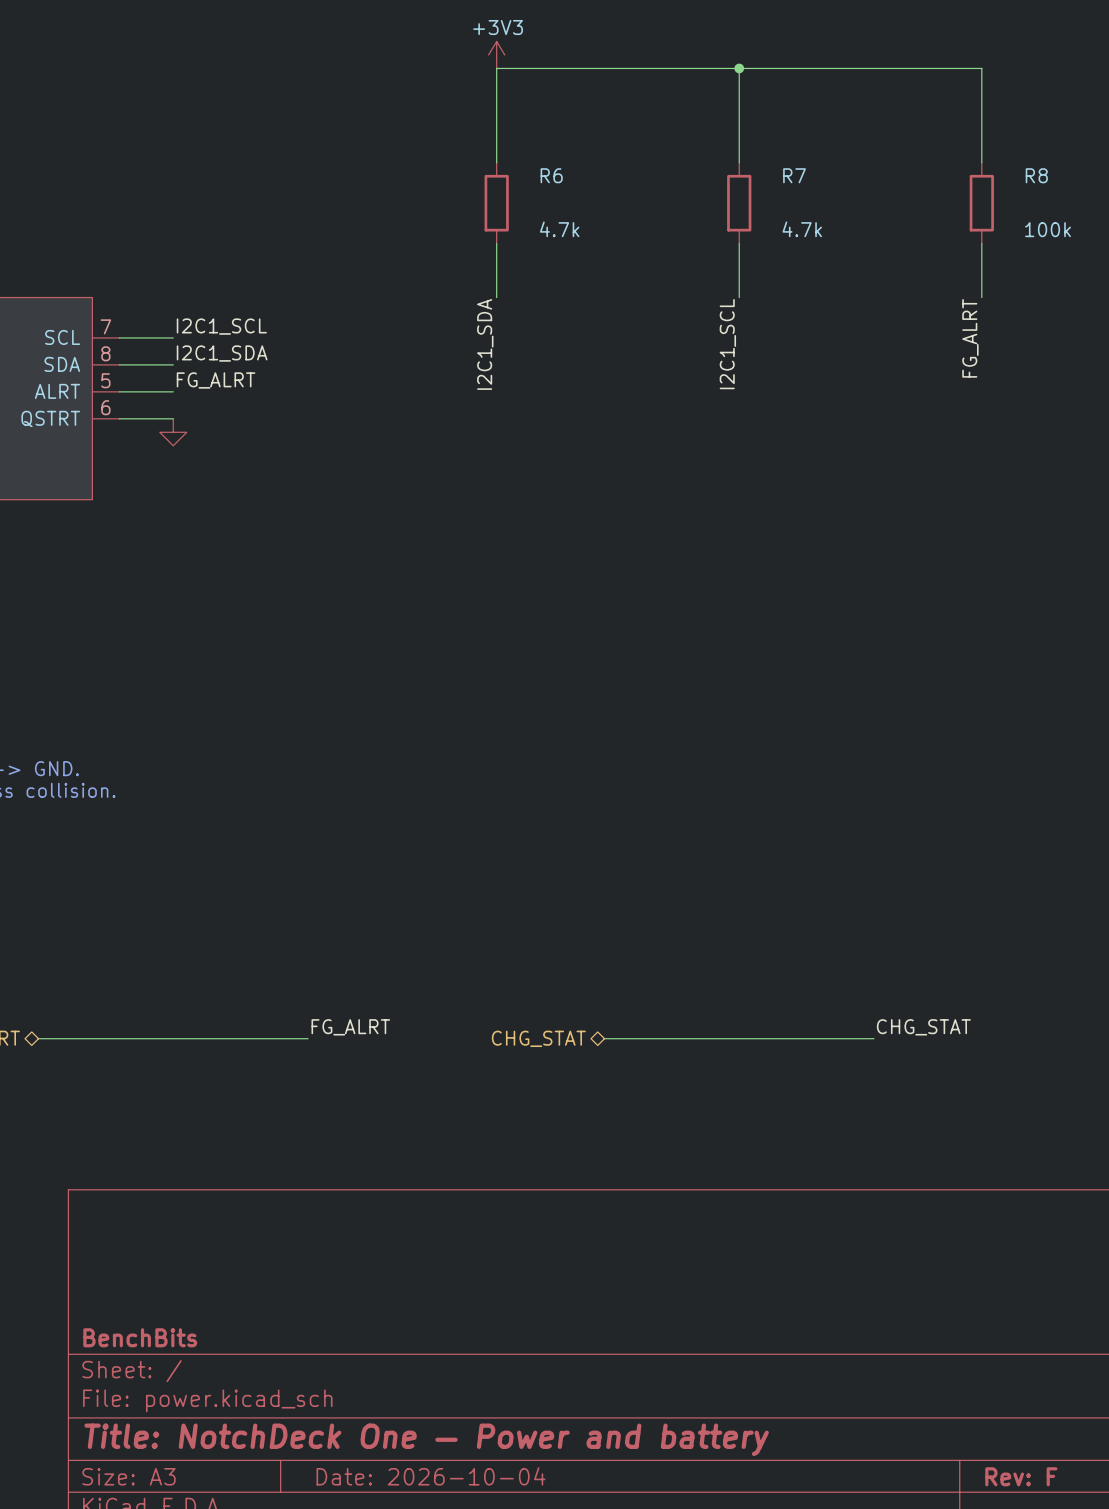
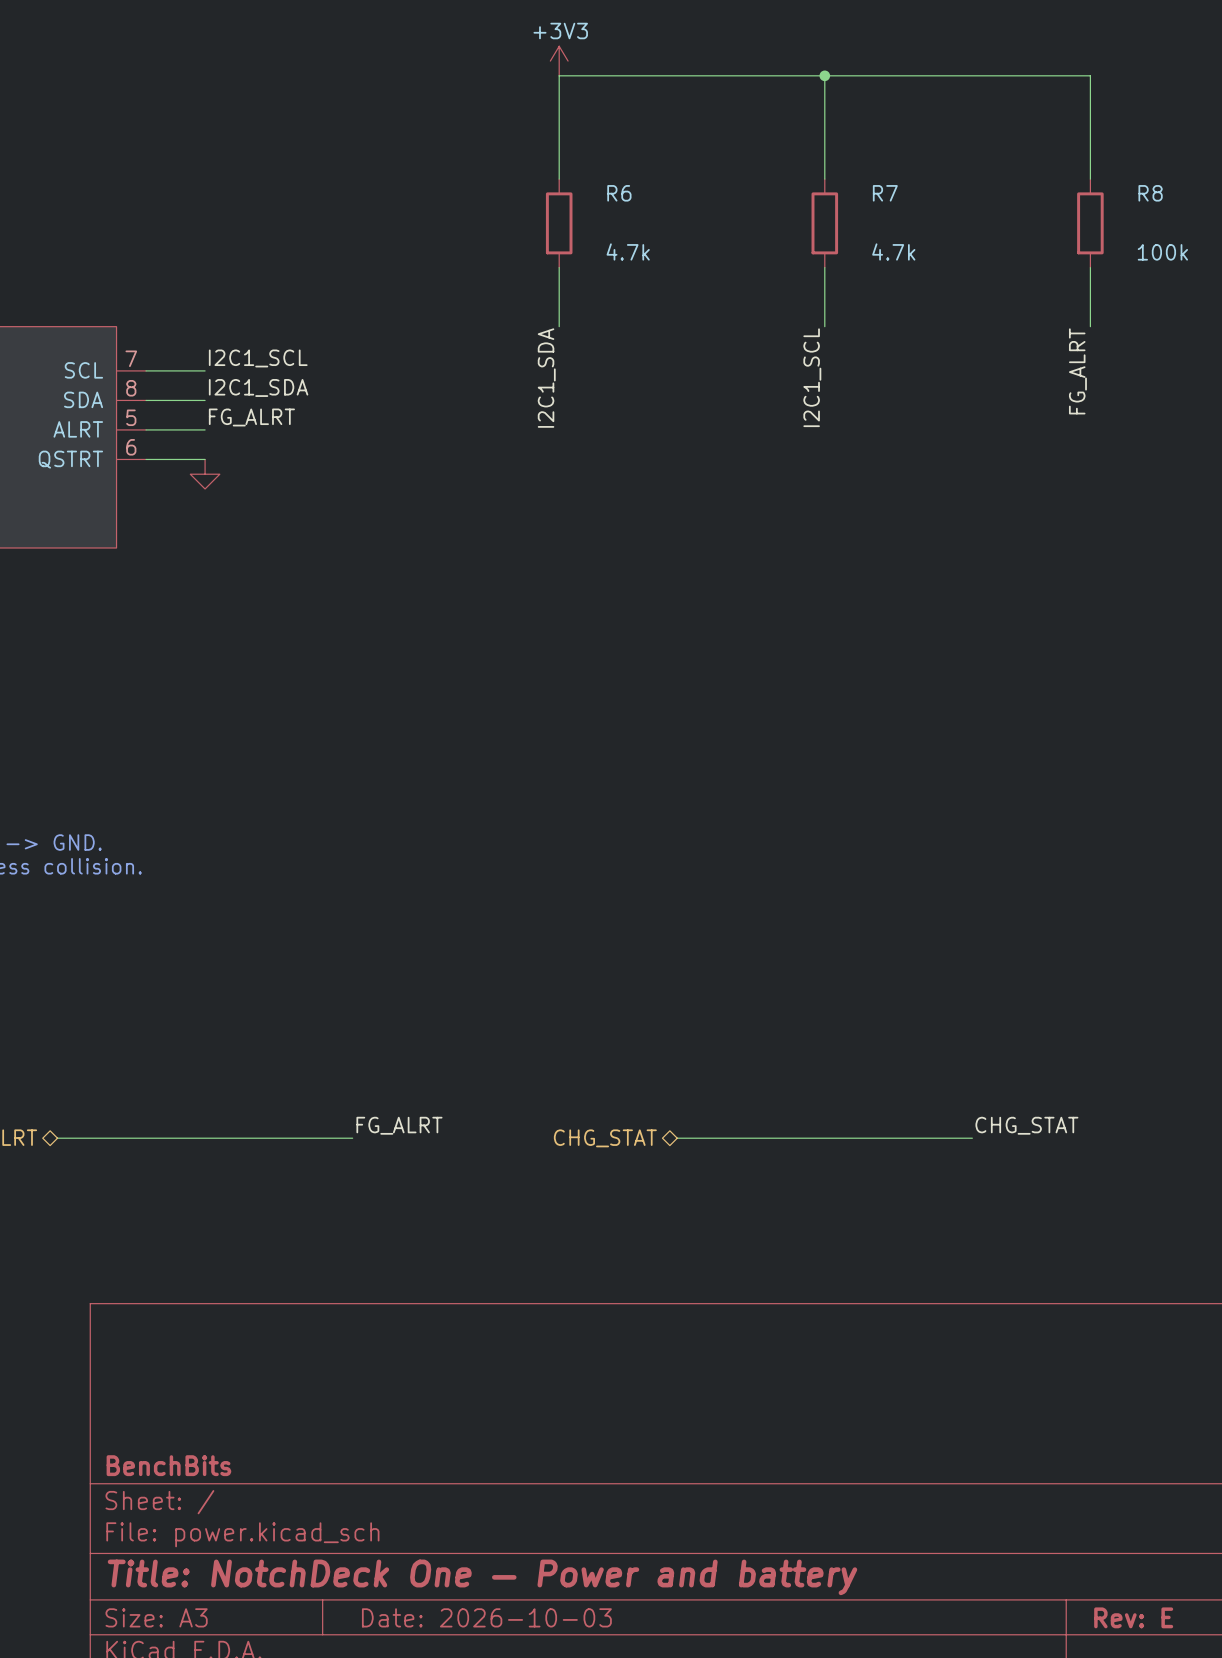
title block: Date: 2026-10-04 (431, 1476) -> Date: 2026-10-03 (486, 1617)
title block: Rev: F (1021, 1476) -> Rev: E (1133, 1617)

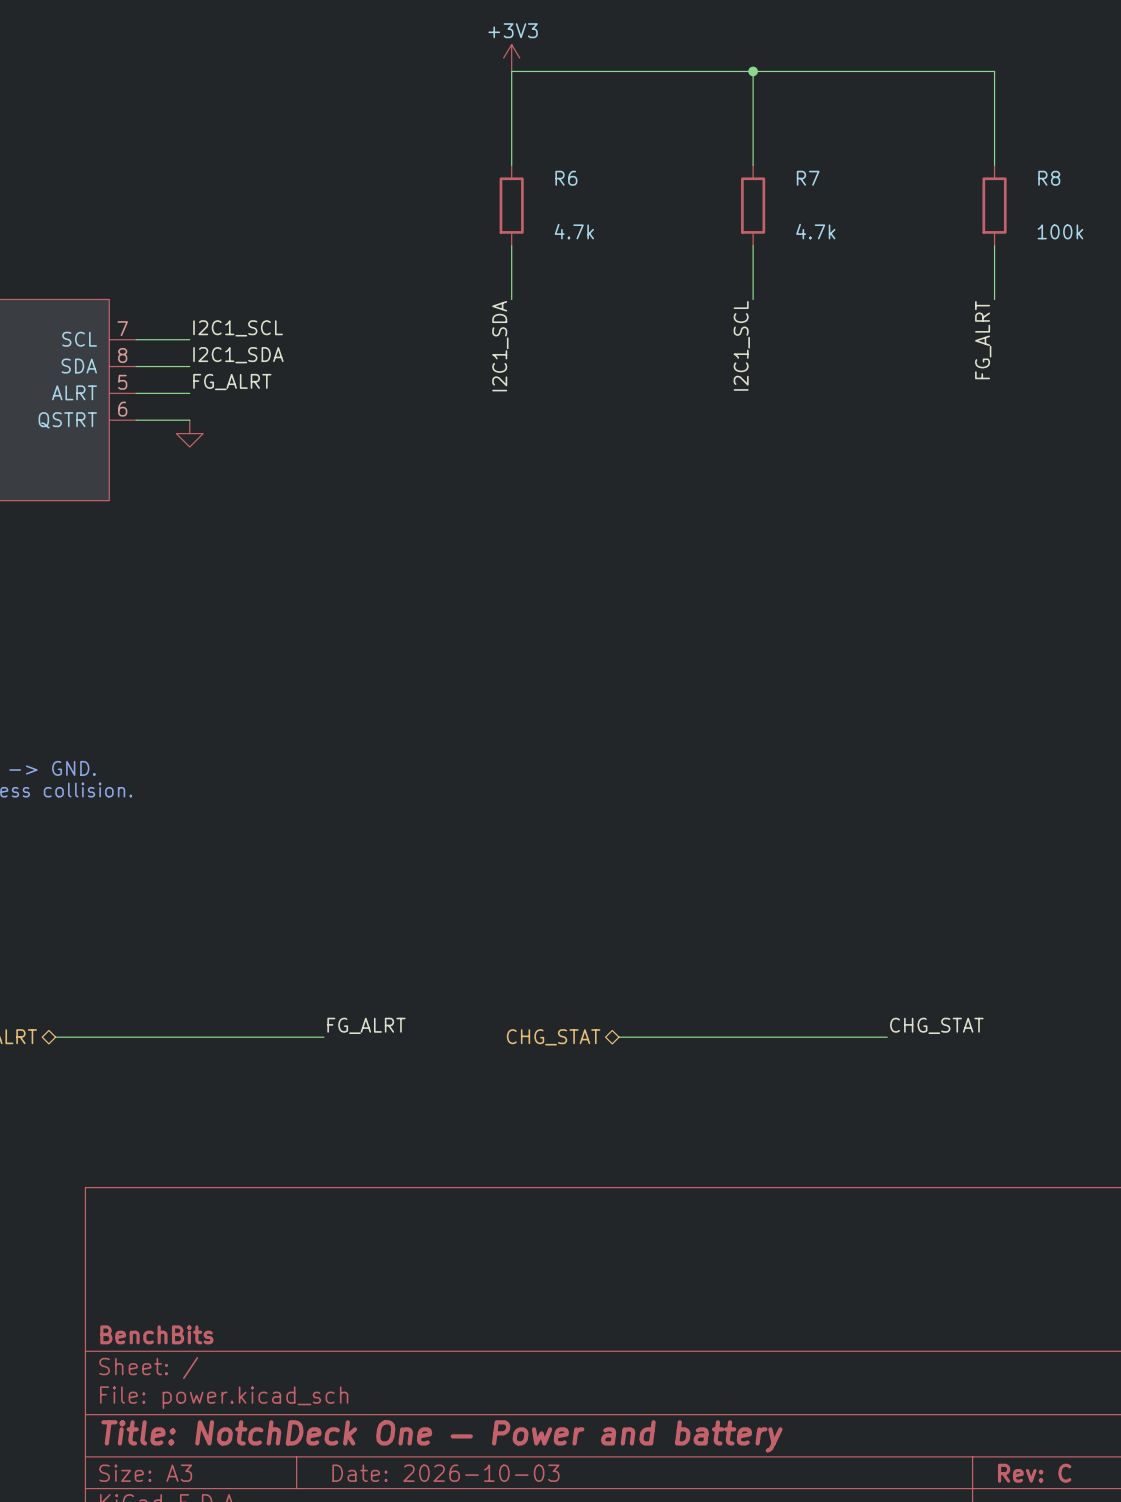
title block: Rev: E (1133, 1617) -> Rev: C (1034, 1473)

